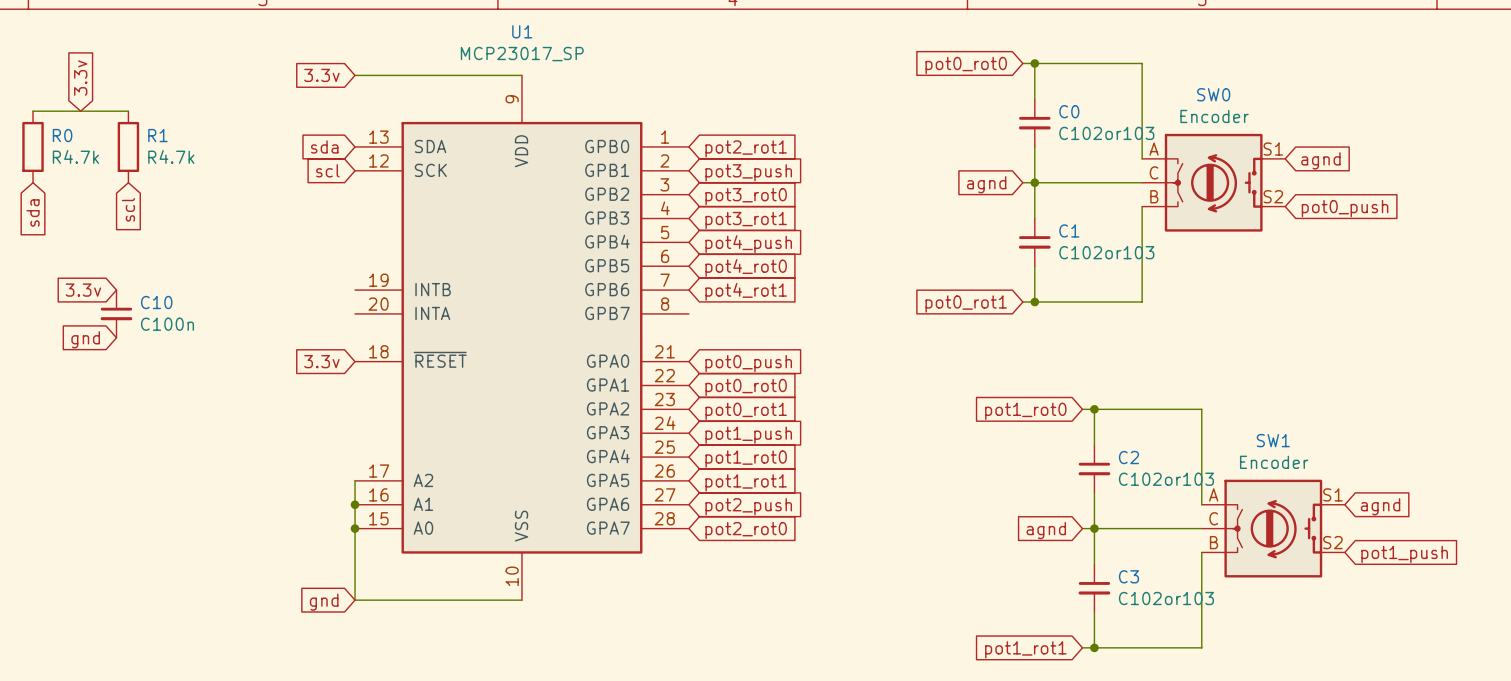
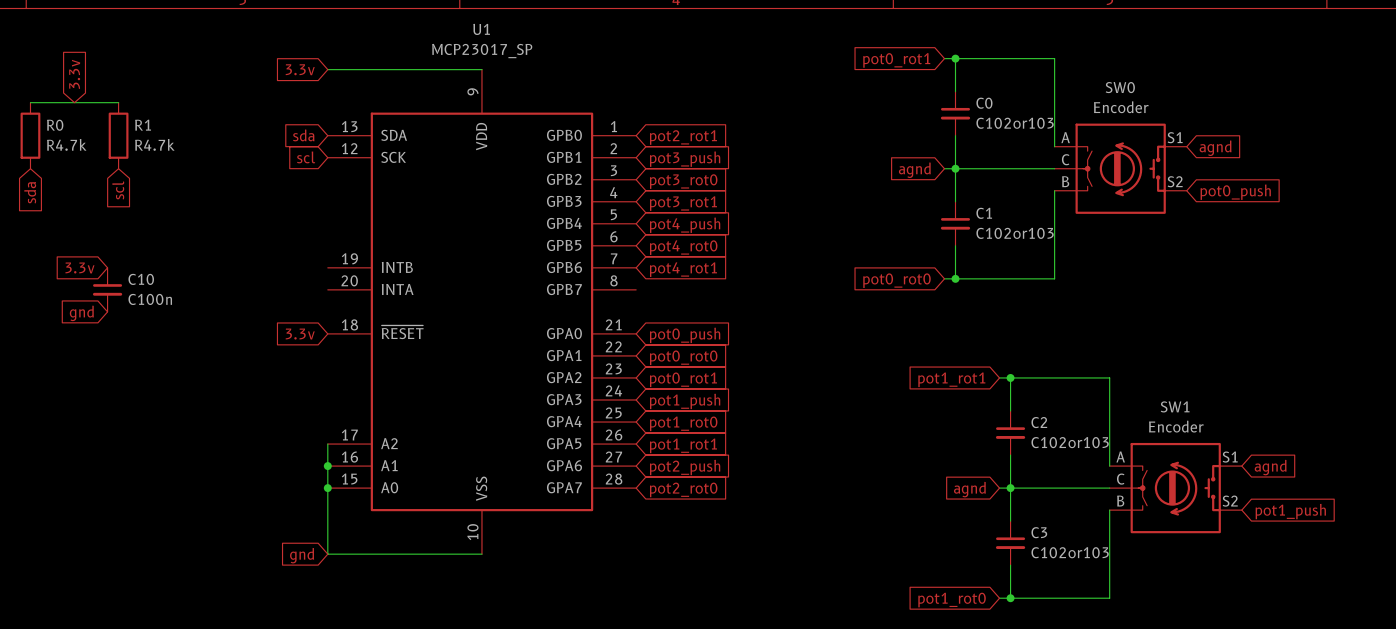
global label: pot0_rot0 (966, 65) -> pot0_rot1 (896, 60)
global label: pot0_rot1 (966, 303) -> pot0_rot0 (897, 280)
global label: pot1_rot0 (1025, 411) -> pot1_rot1 (951, 379)
global label: pot1_rot1 (1025, 649) -> pot1_rot0 (952, 600)

